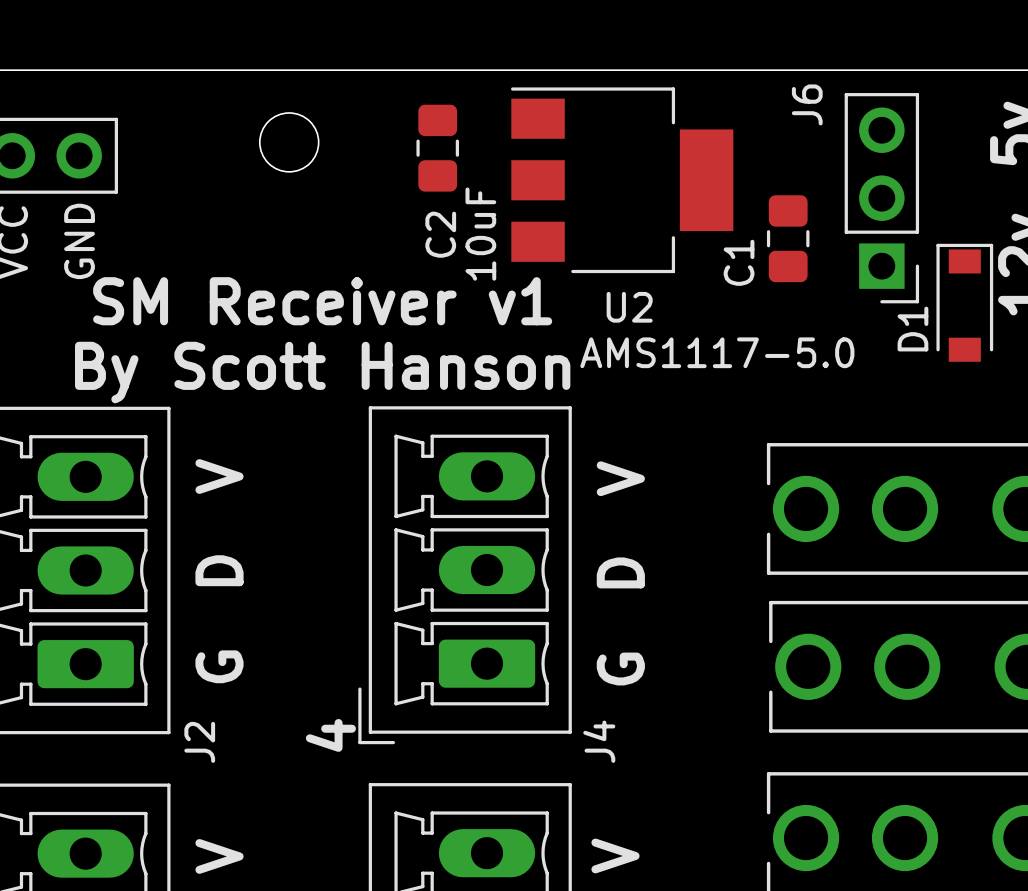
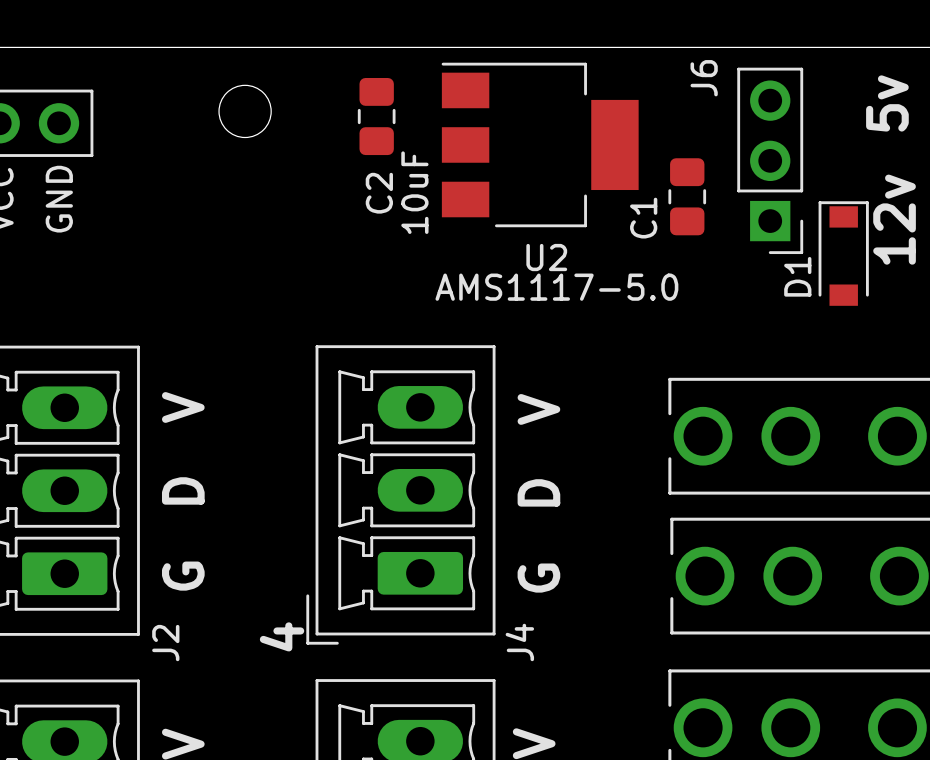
text: SM Receiver v1 (322, 301) -> none
U2 value position: AMS1117-5.0 (717, 352) -> AMS1117-5.0 (556, 287)
text: By Scott Hanson (322, 372) -> none

